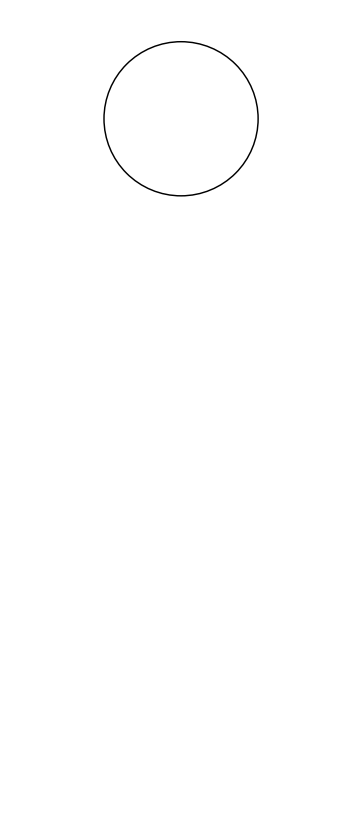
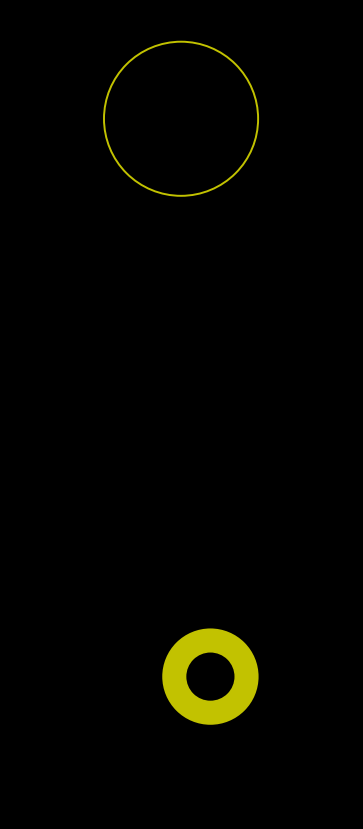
part: none -> (210, 676)

